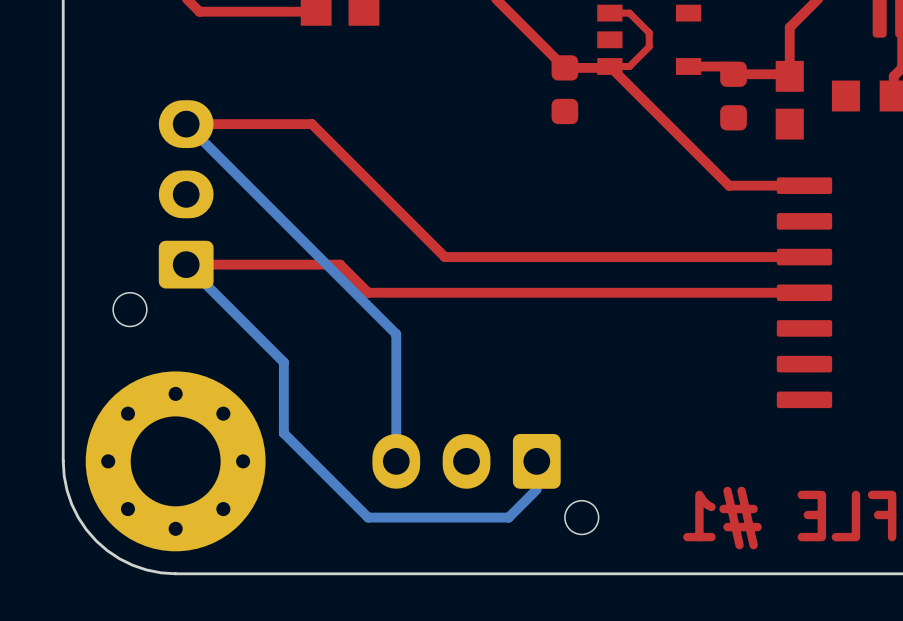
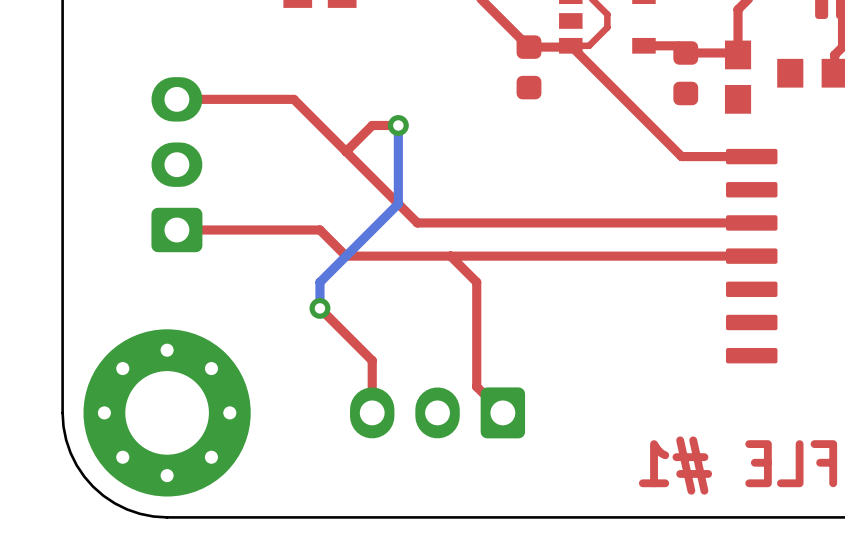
bottom track: (186, 124) (396, 334) (396, 461) -> none
bottom track: none -> (398, 125) (398, 203) (319, 282) (319, 308)
top track: none -> (398, 125) (372, 125) (346, 151)
via: none -> (398, 125)
part: none -> (176, 164)
part: (163, 213) -> none
bottom track: (186, 264) (283, 362) (283, 433) (368, 517) (508, 517) (536, 489) (536, 461) -> none
top track: none -> (450, 256) (476, 282) (476, 386) (502, 412)
top track: none -> (319, 308) (372, 360) (372, 412)
via: none -> (319, 308)
part: none -> (437, 412)
part: (485, 484) -> none

